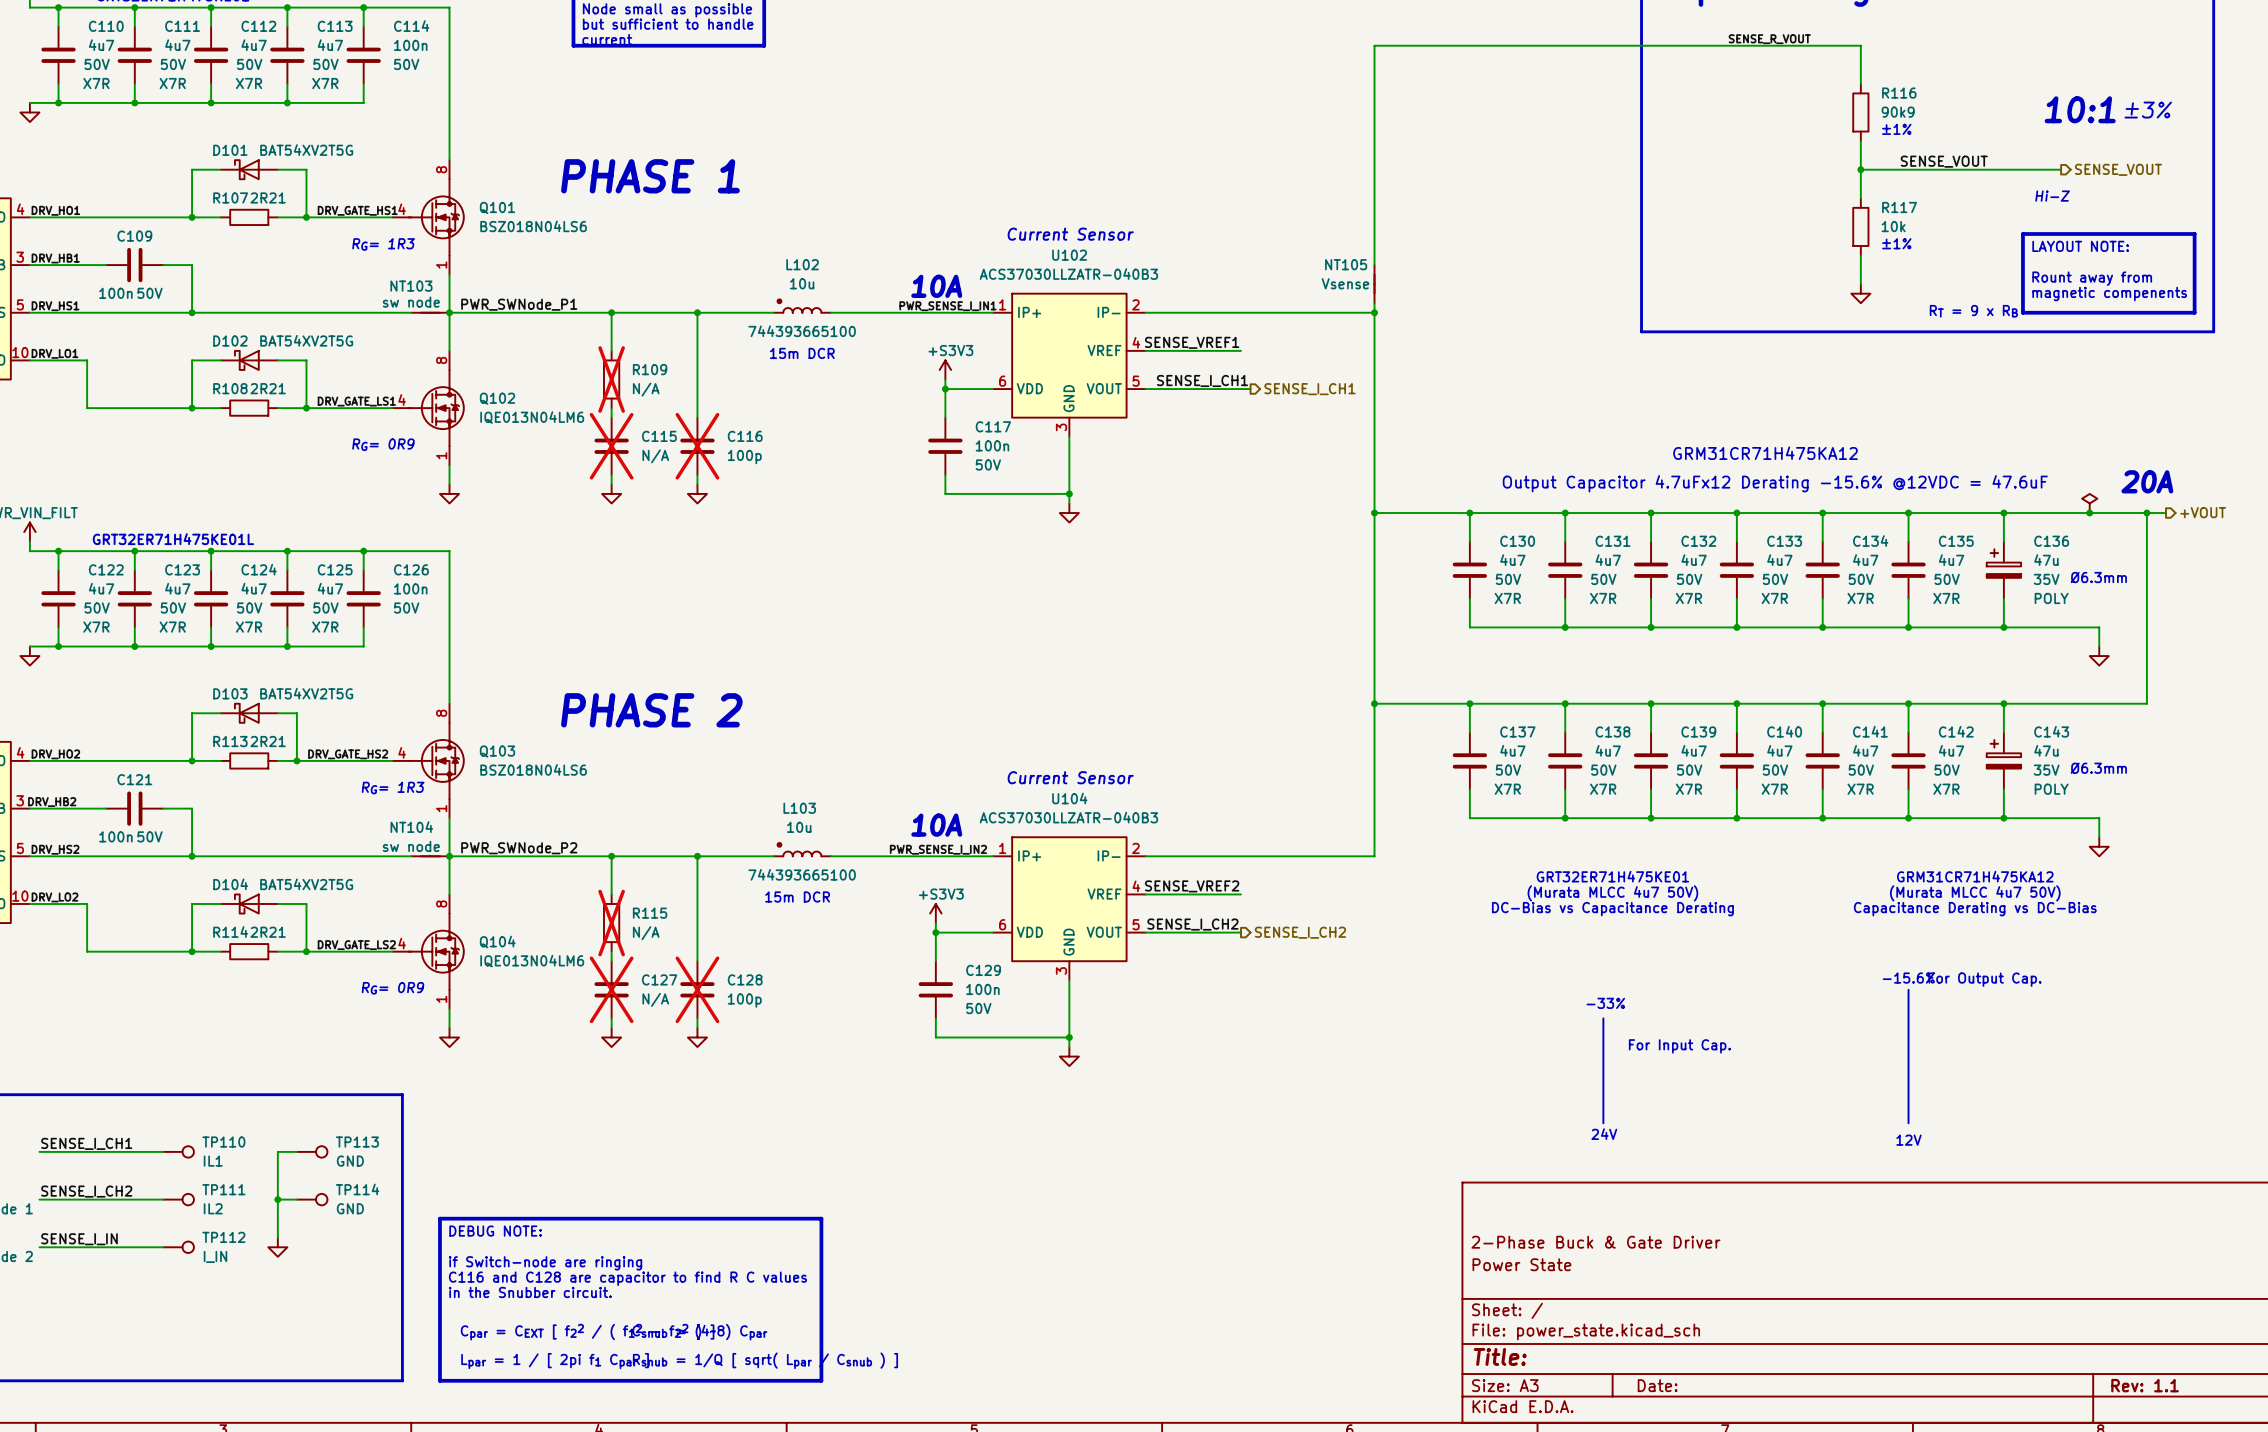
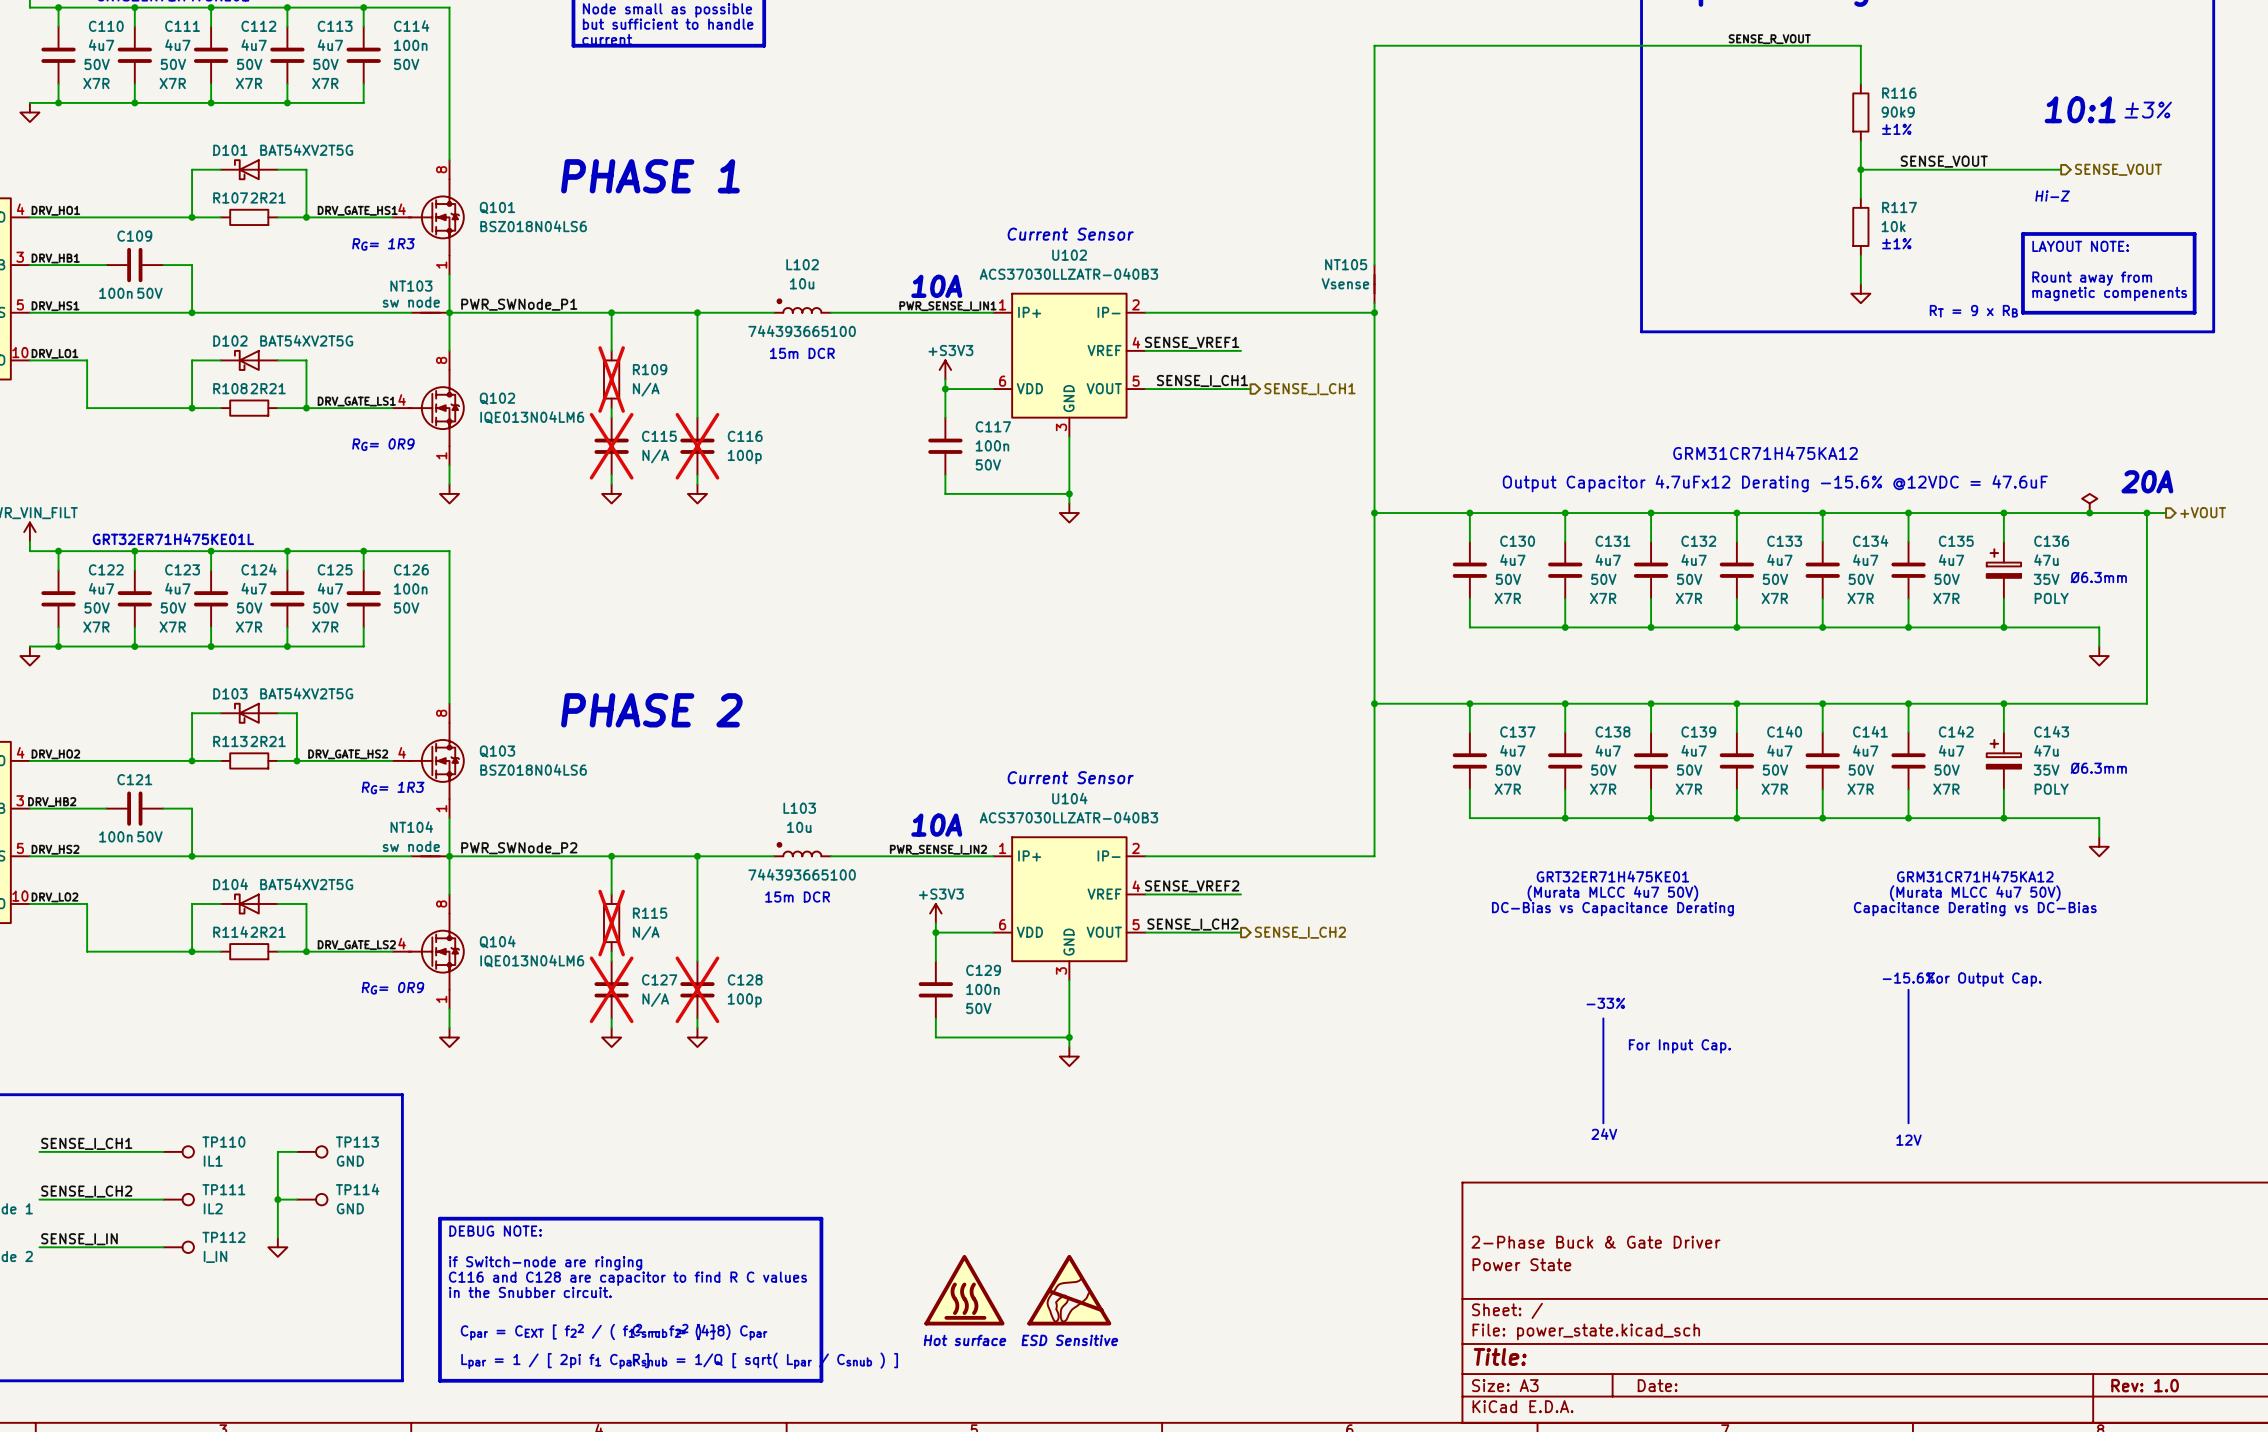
part: none -> (964, 1290)
part: none -> (1069, 1290)
text: none -> Hot surface (965, 1340)
text: none -> ESD Sensitive (1069, 1340)
title block: Rev: 1.1 (2145, 1385) -> Rev: 1.0 (2145, 1385)

